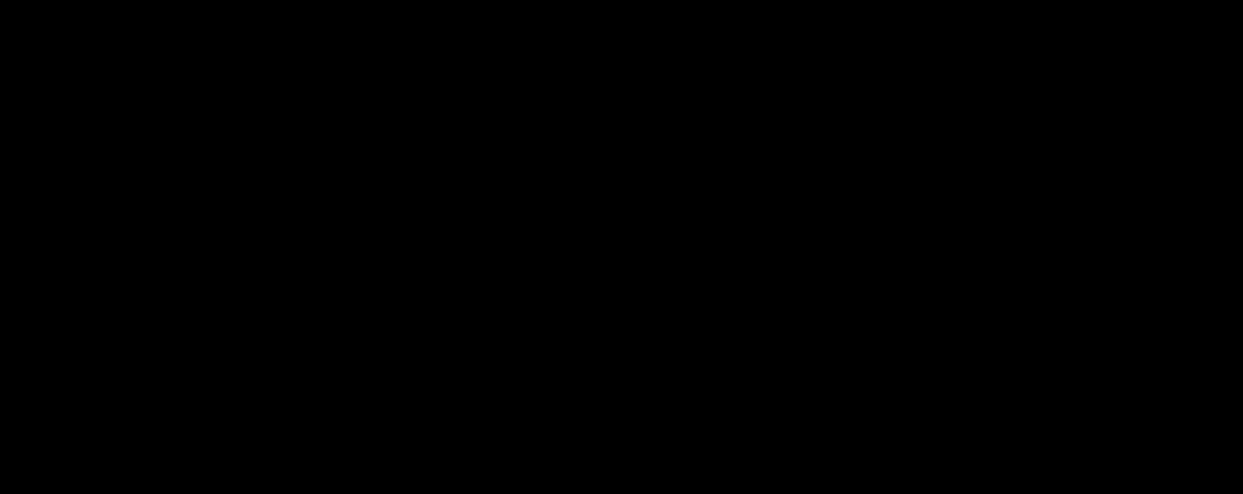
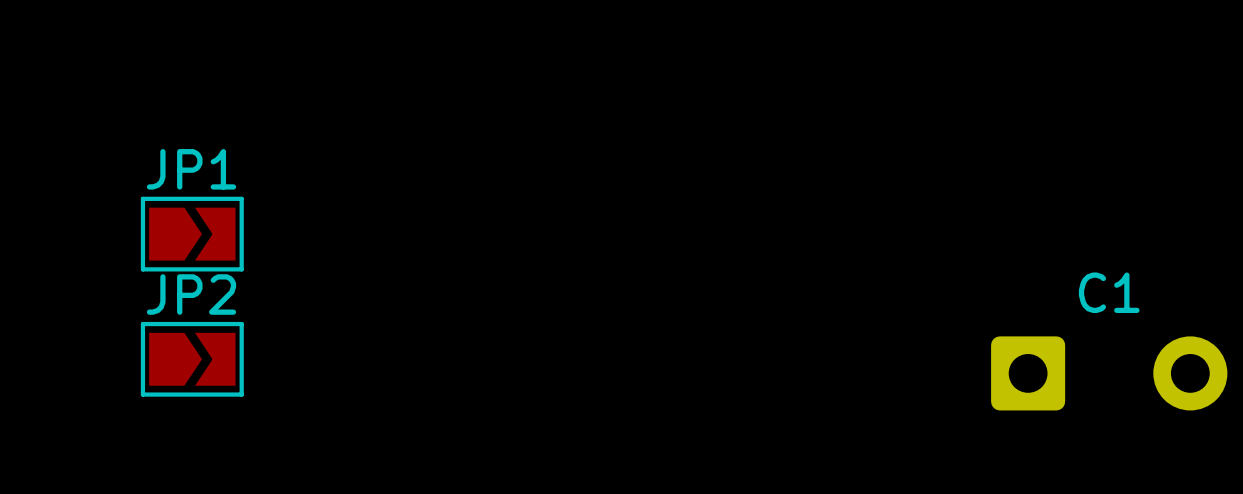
JP1: none -> (192, 234)
JP2: none -> (192, 359)
C1: none -> (1109, 373)

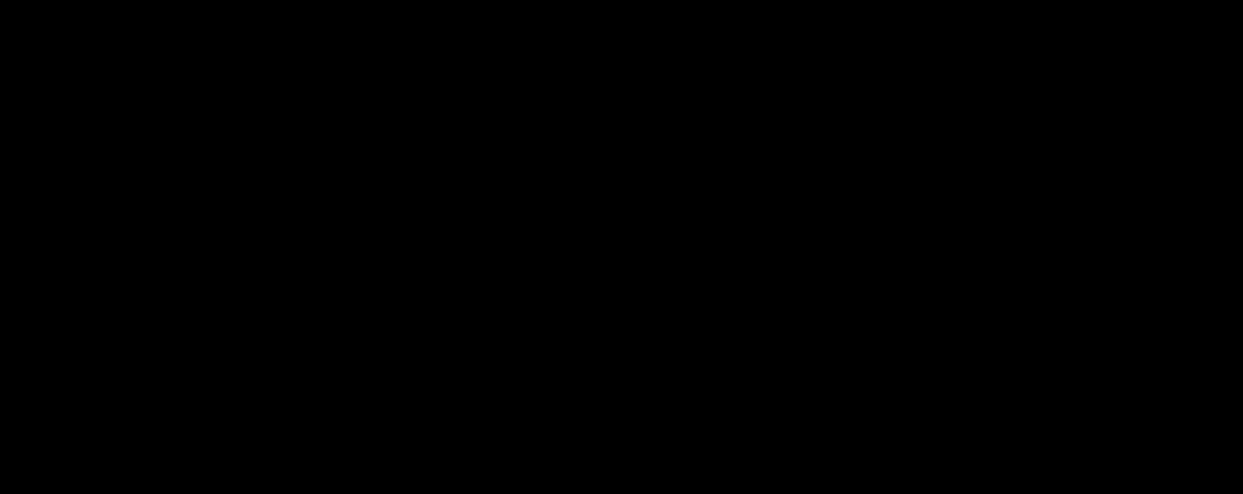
JP1: (192, 234) -> none
JP2: (192, 359) -> none
C1: (1109, 373) -> none

